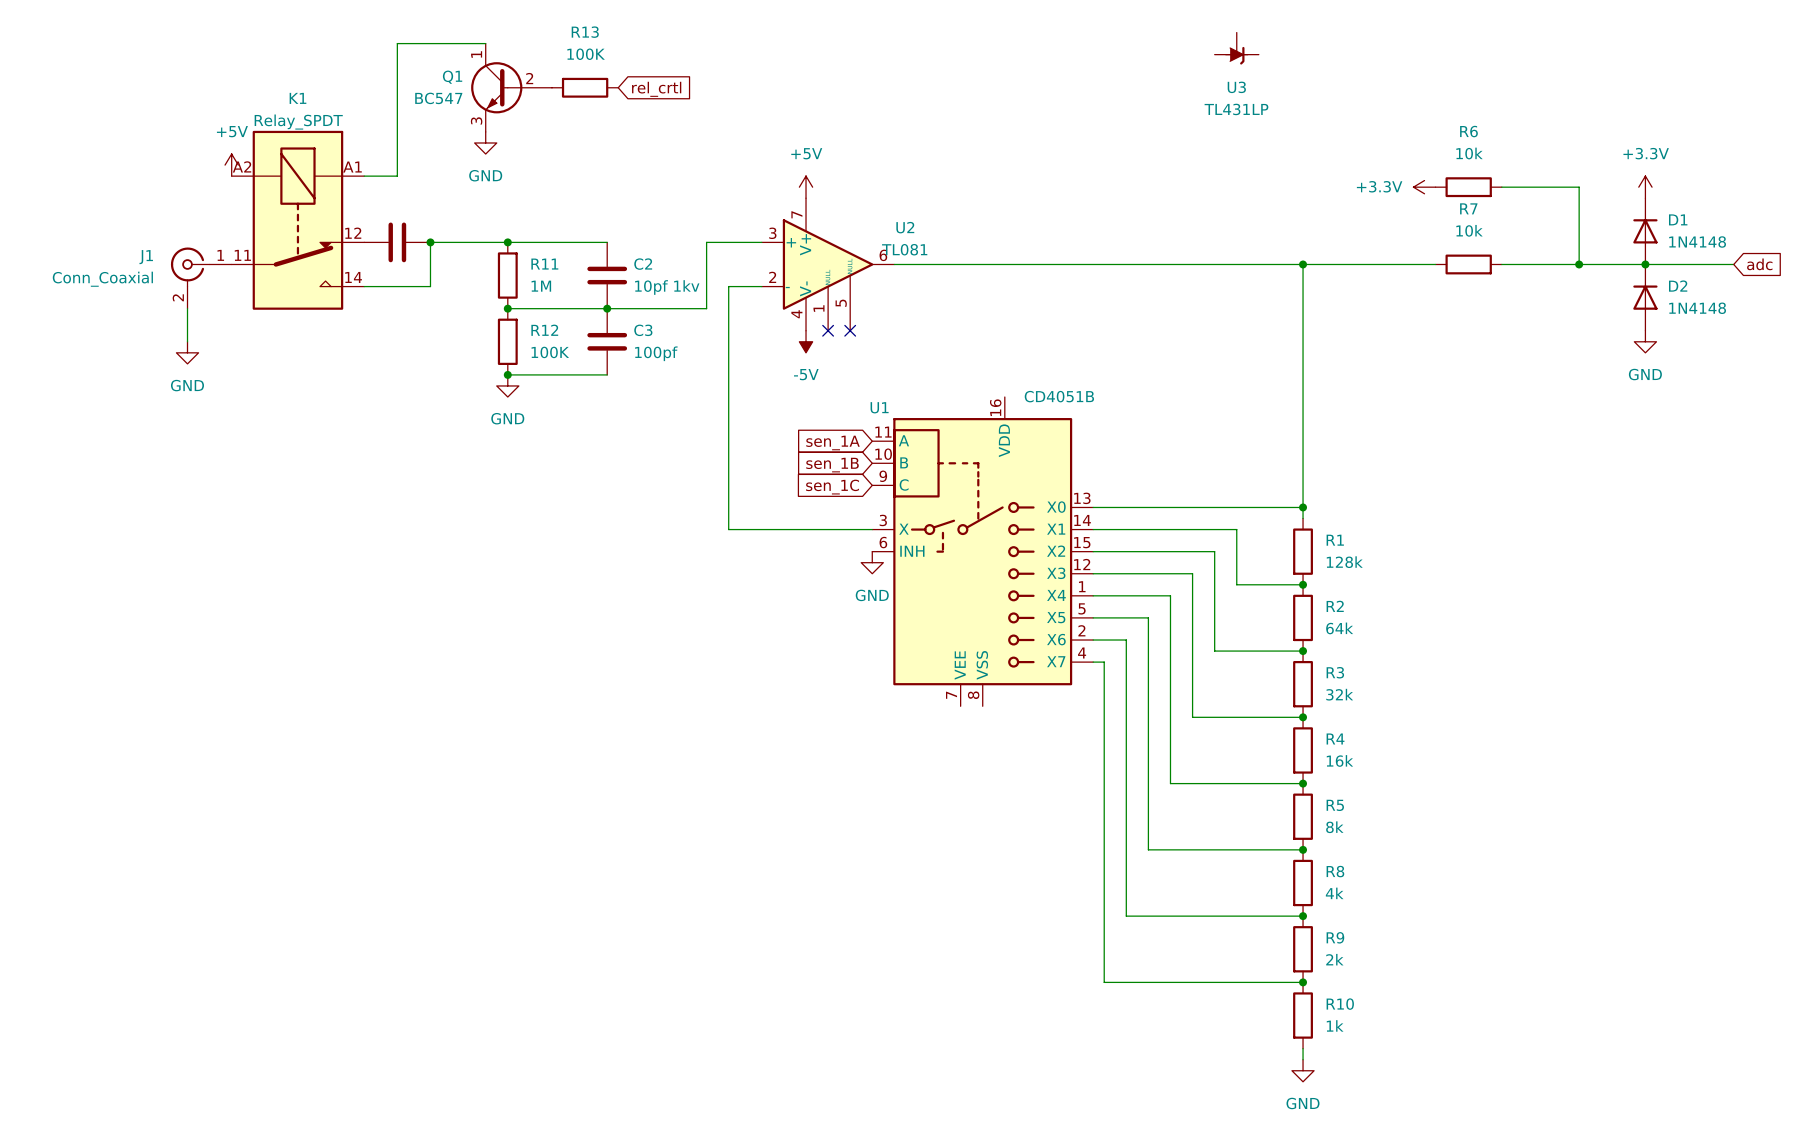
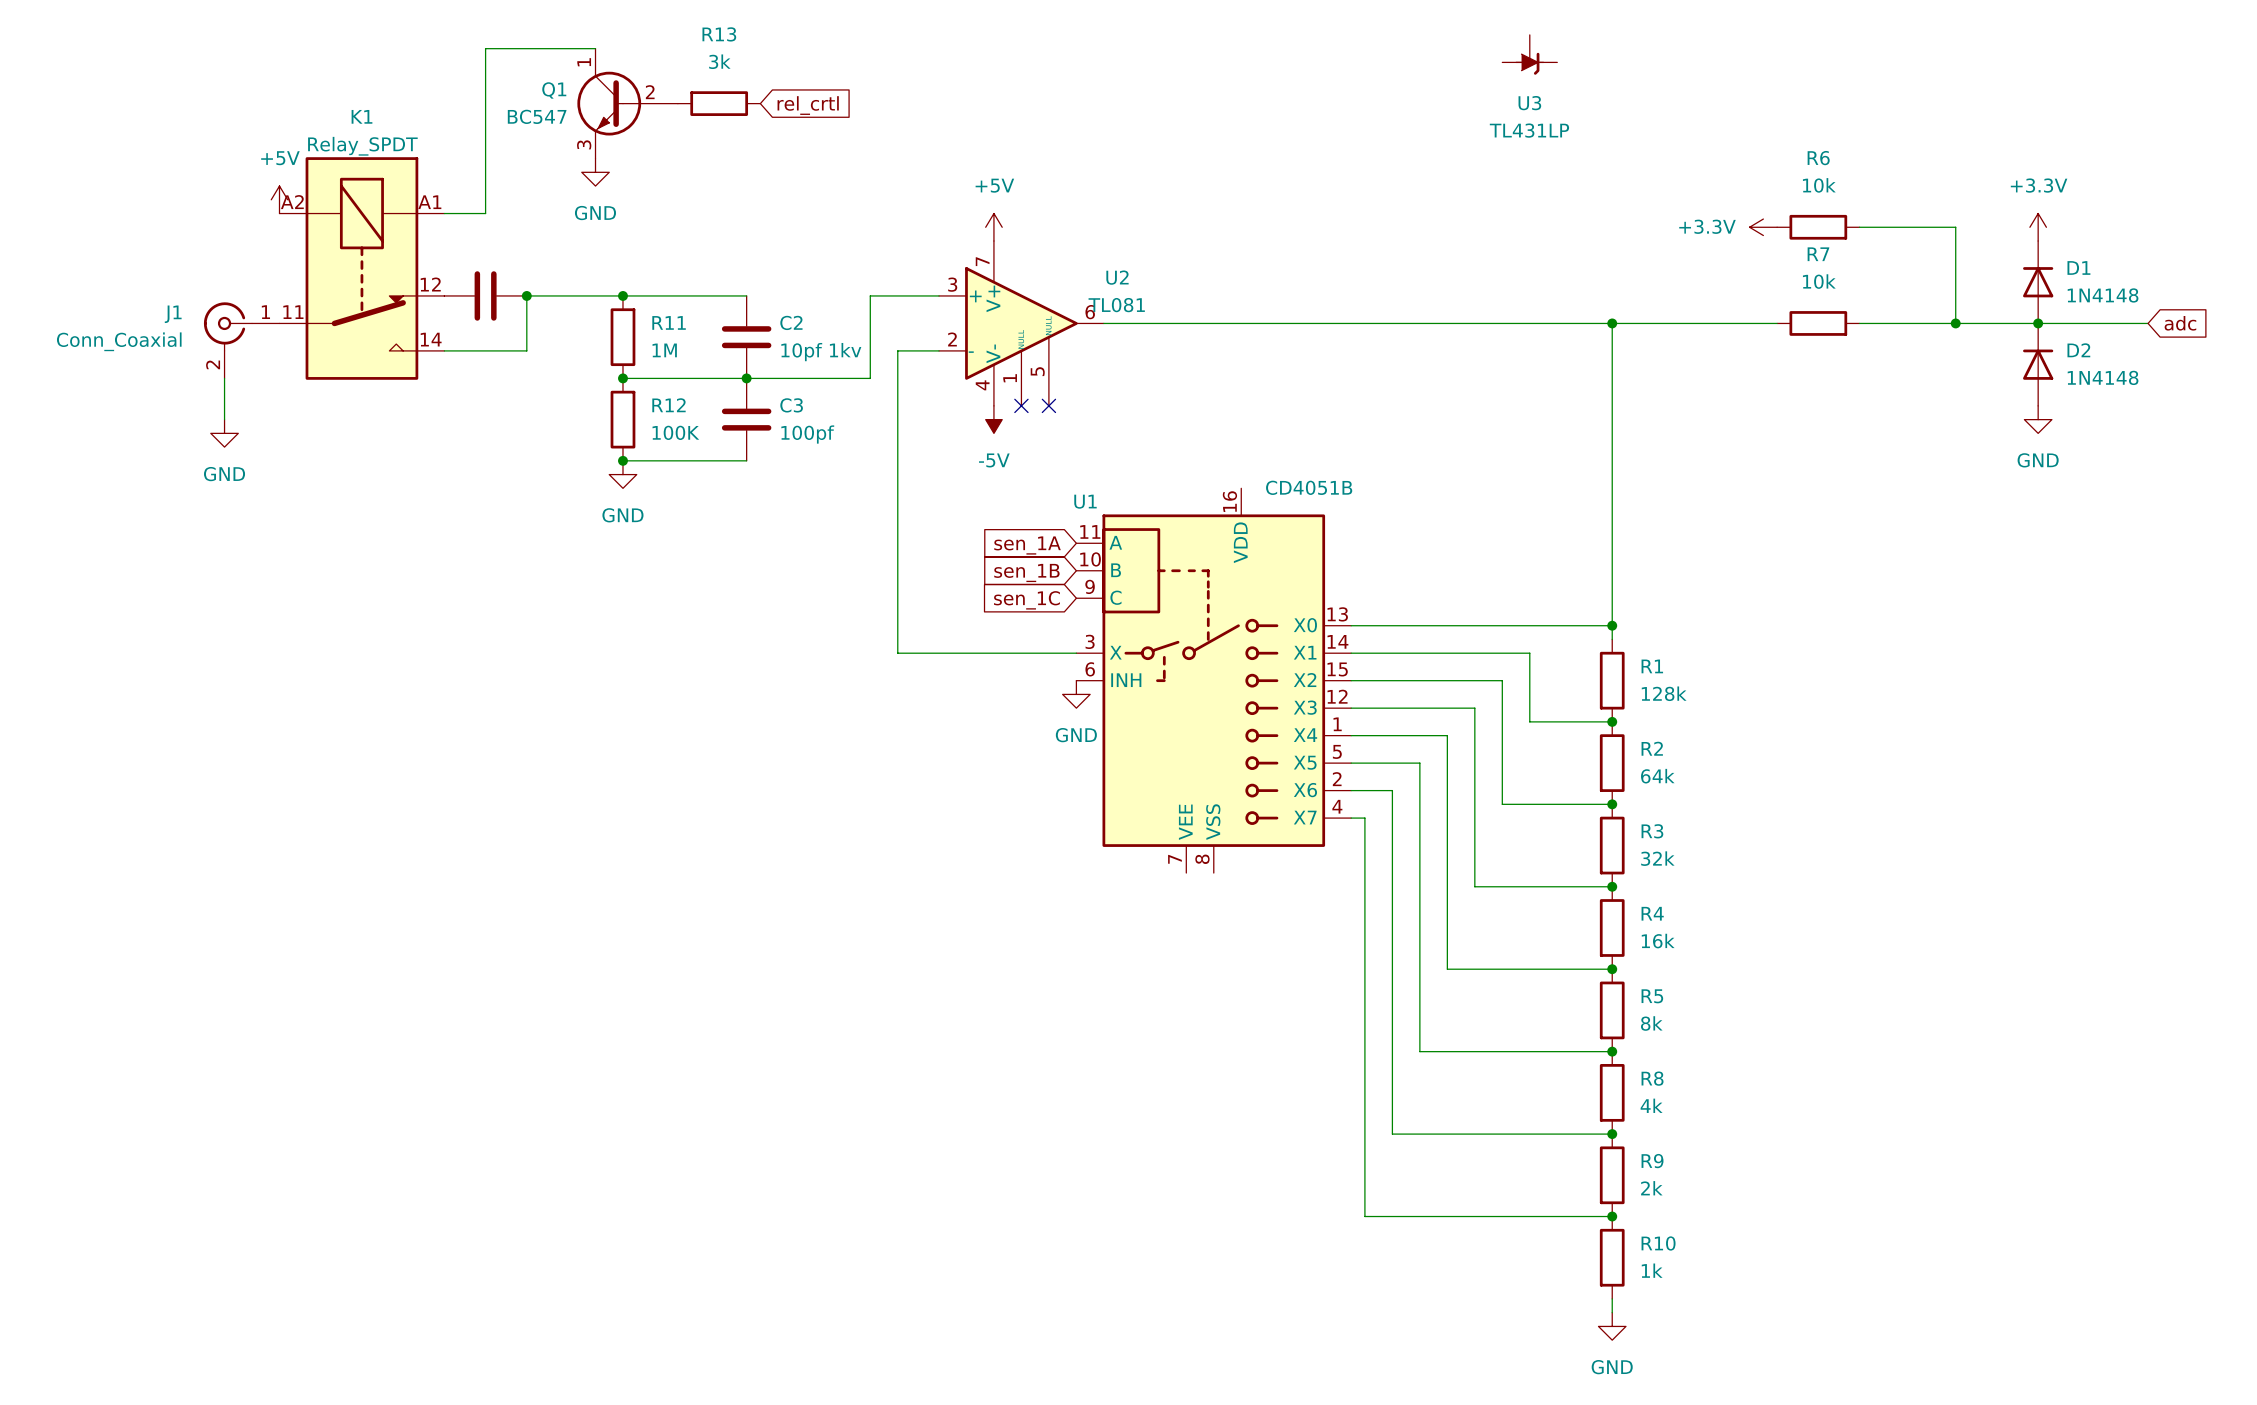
R13 value: 100K (586, 54) -> 3k (719, 61)

